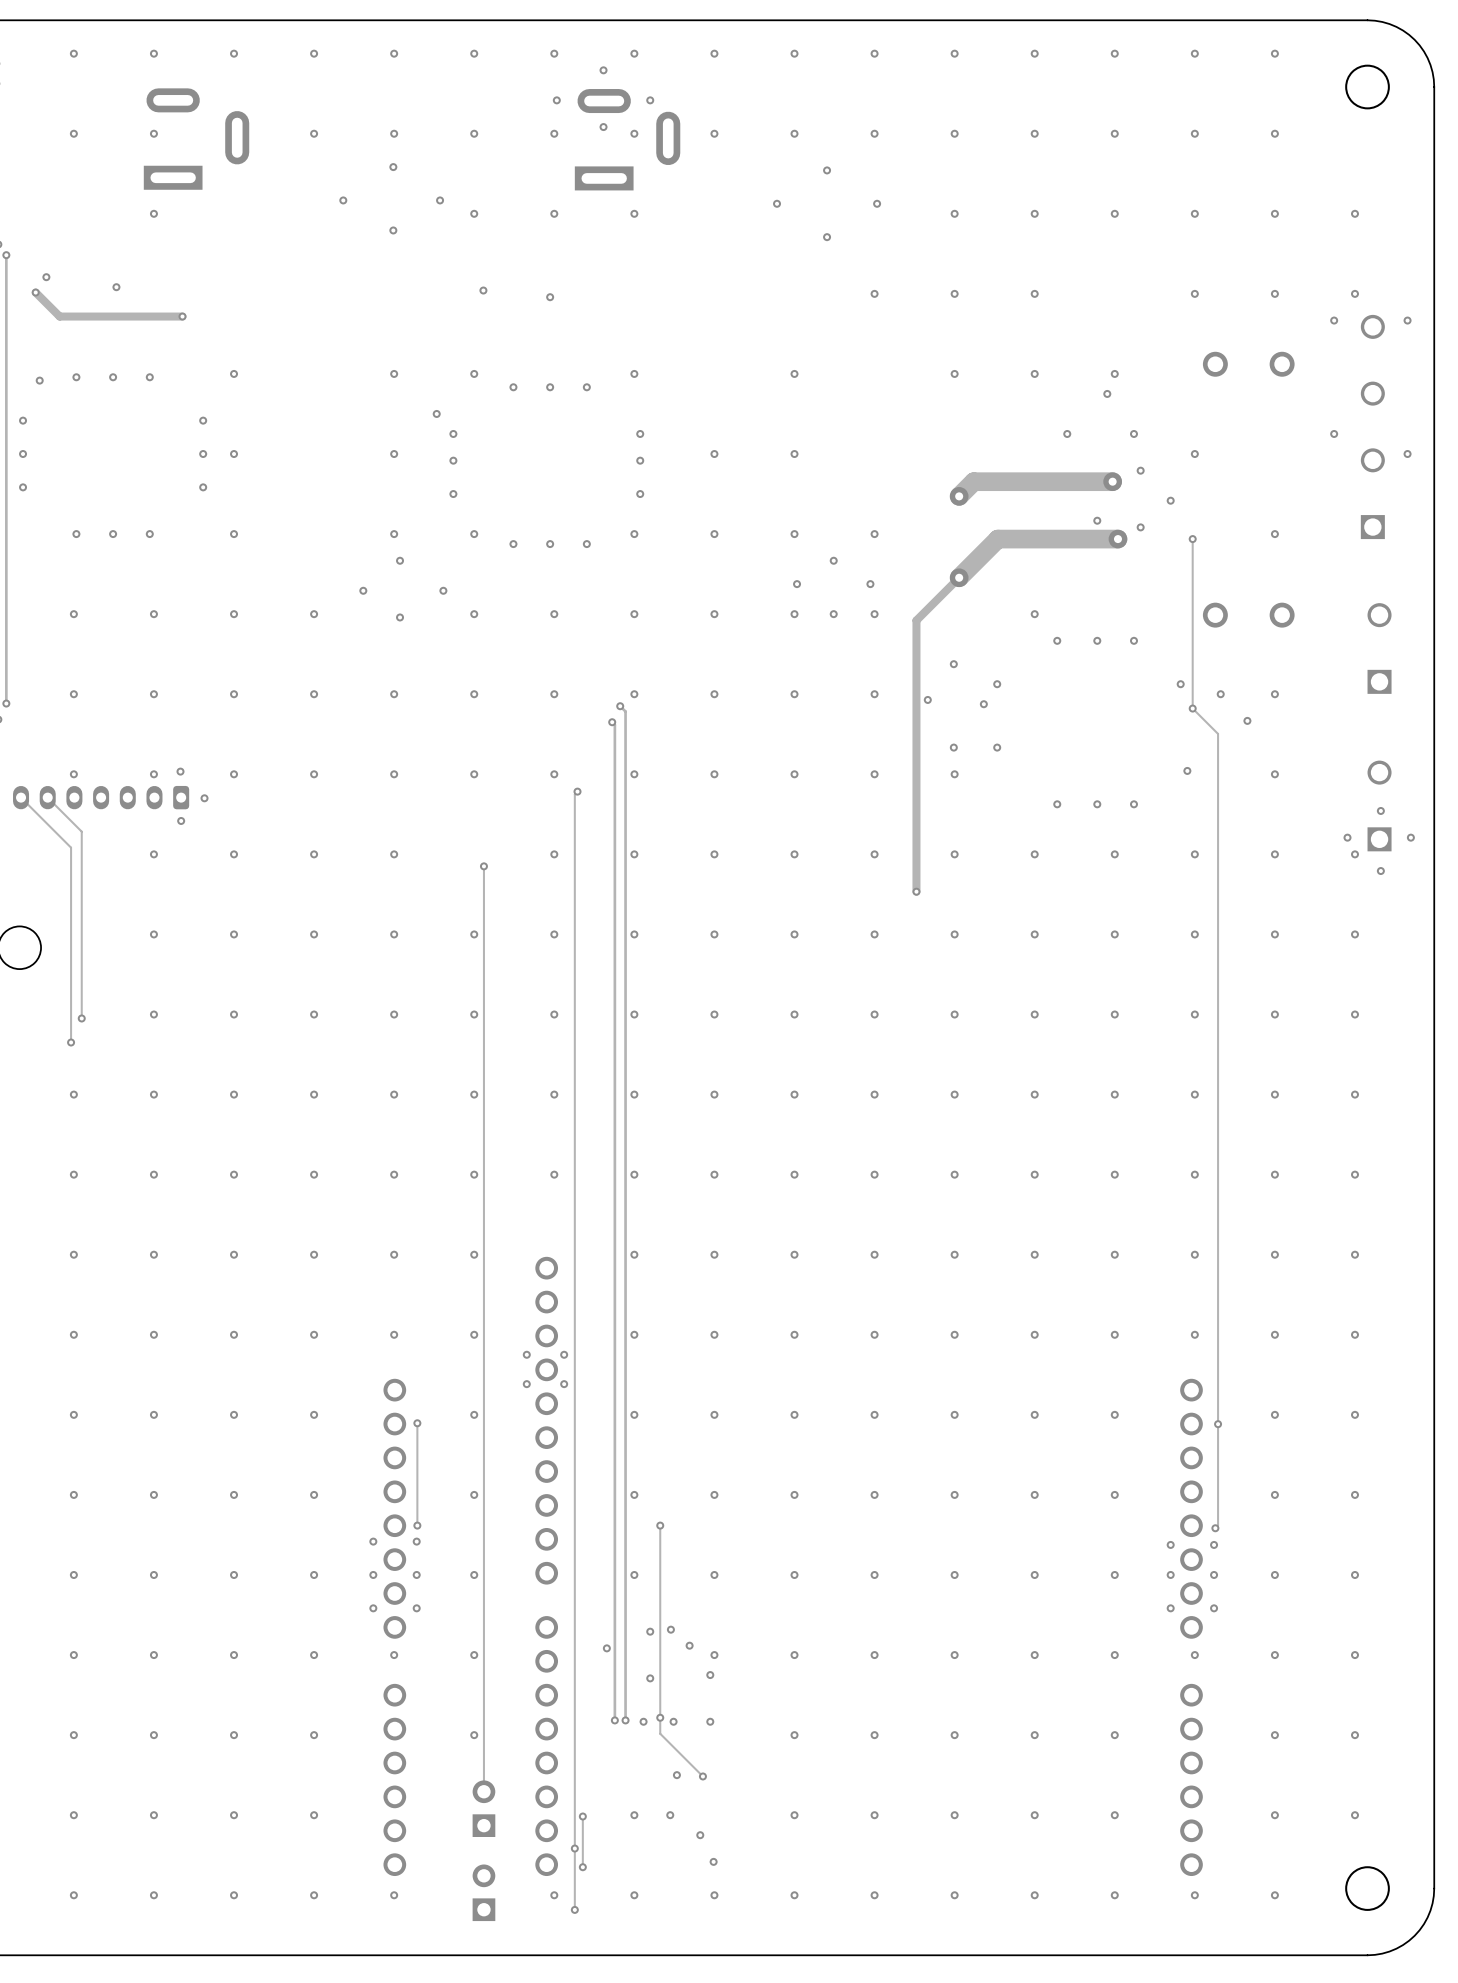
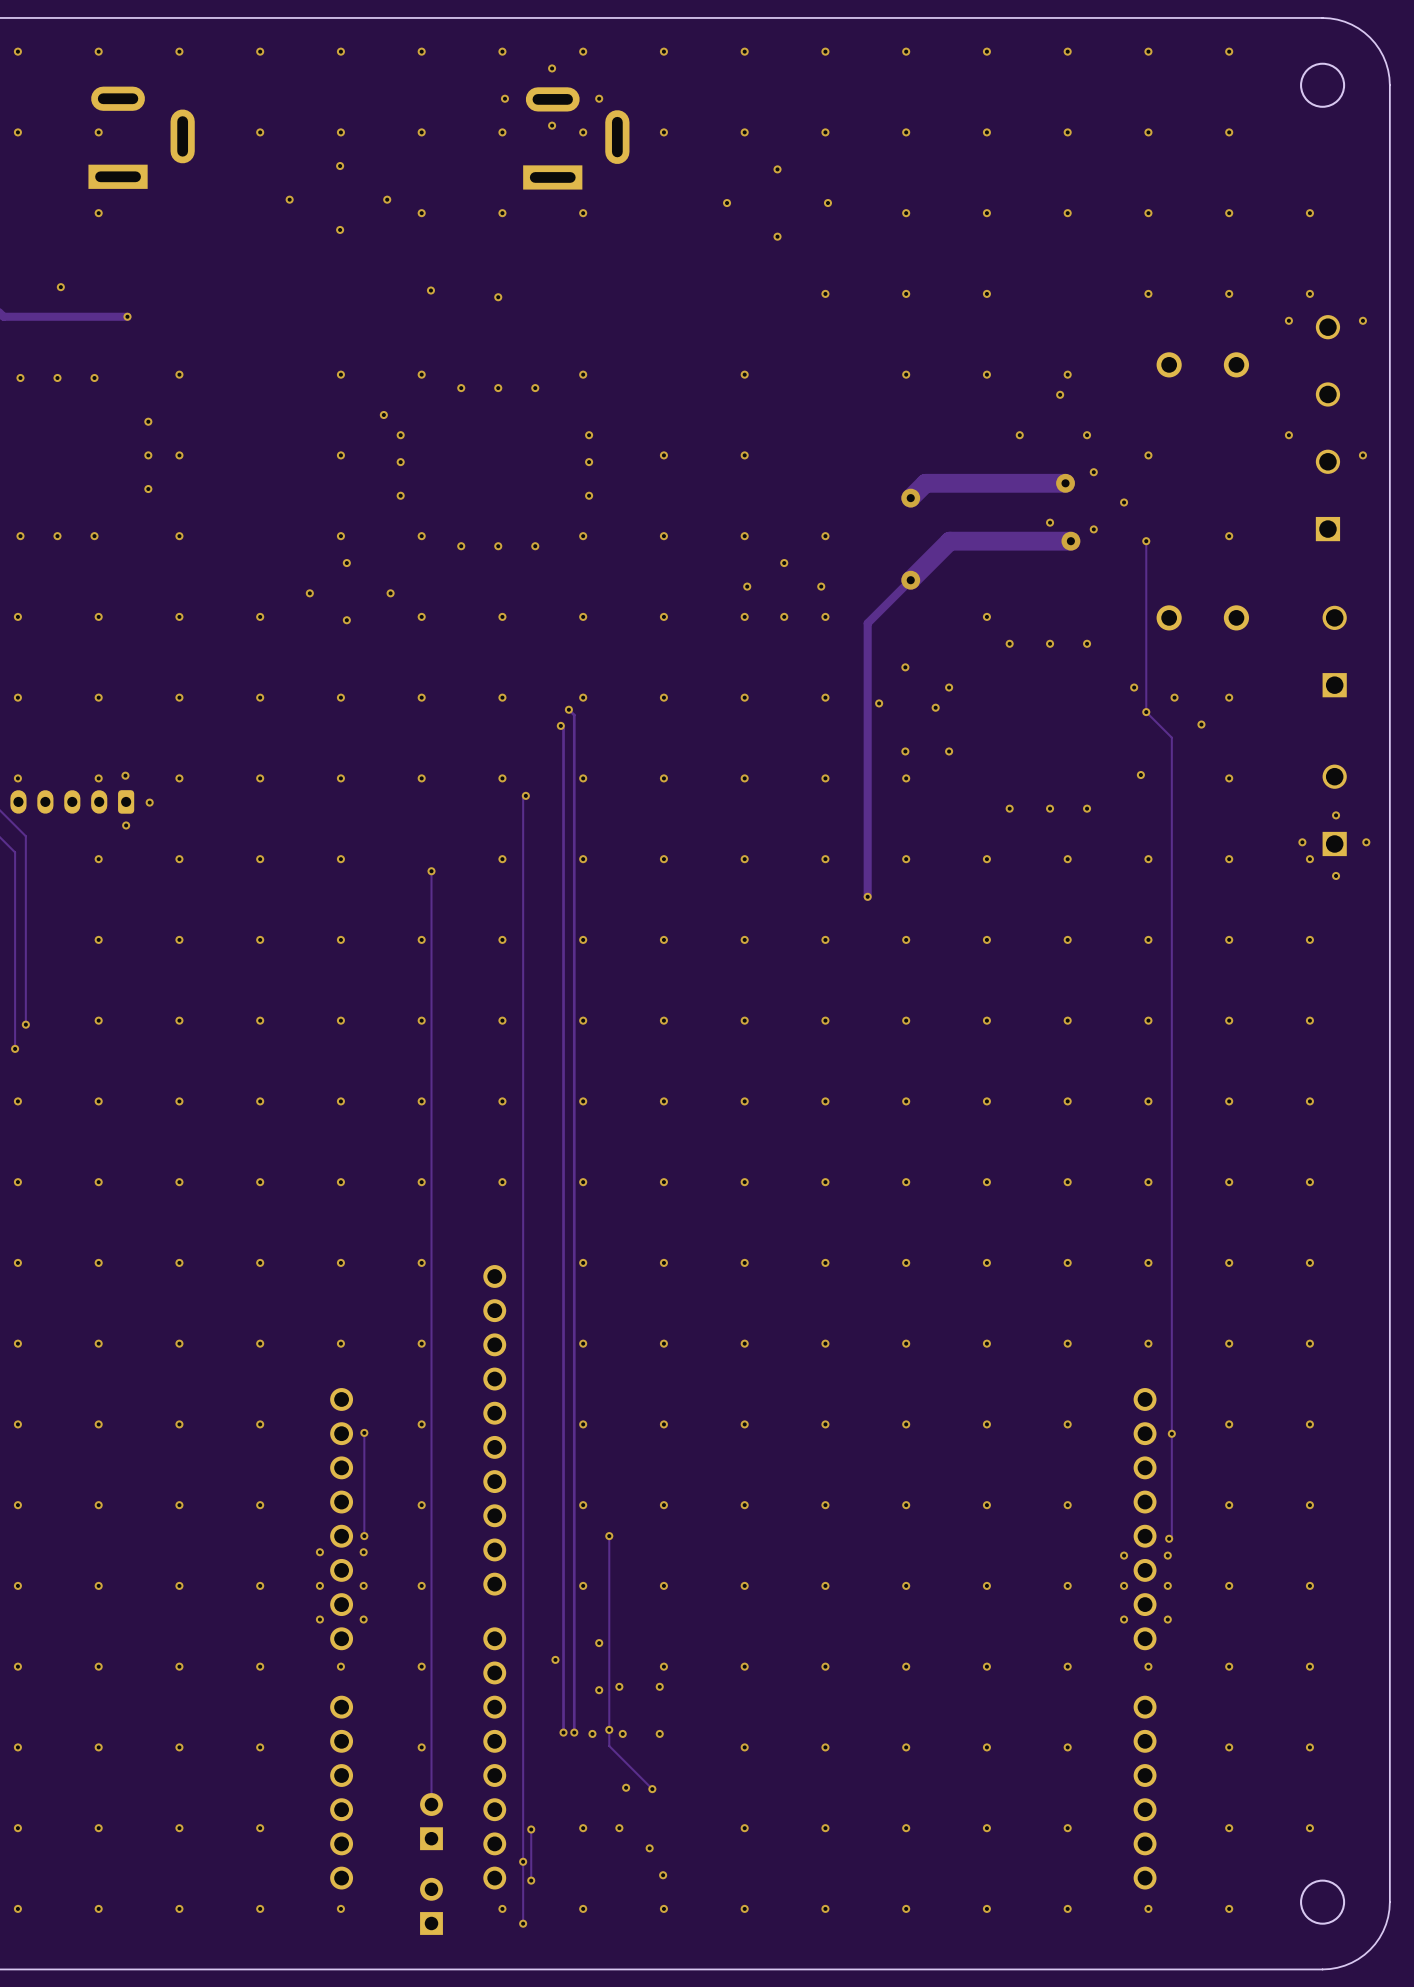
via: (526, 1354) -> none
via: (564, 1354) -> none
via: (526, 1384) -> none
via: (564, 1384) -> none
via: (670, 1629) -> none
via: (689, 1645) -> none
via: none -> (619, 1686)

